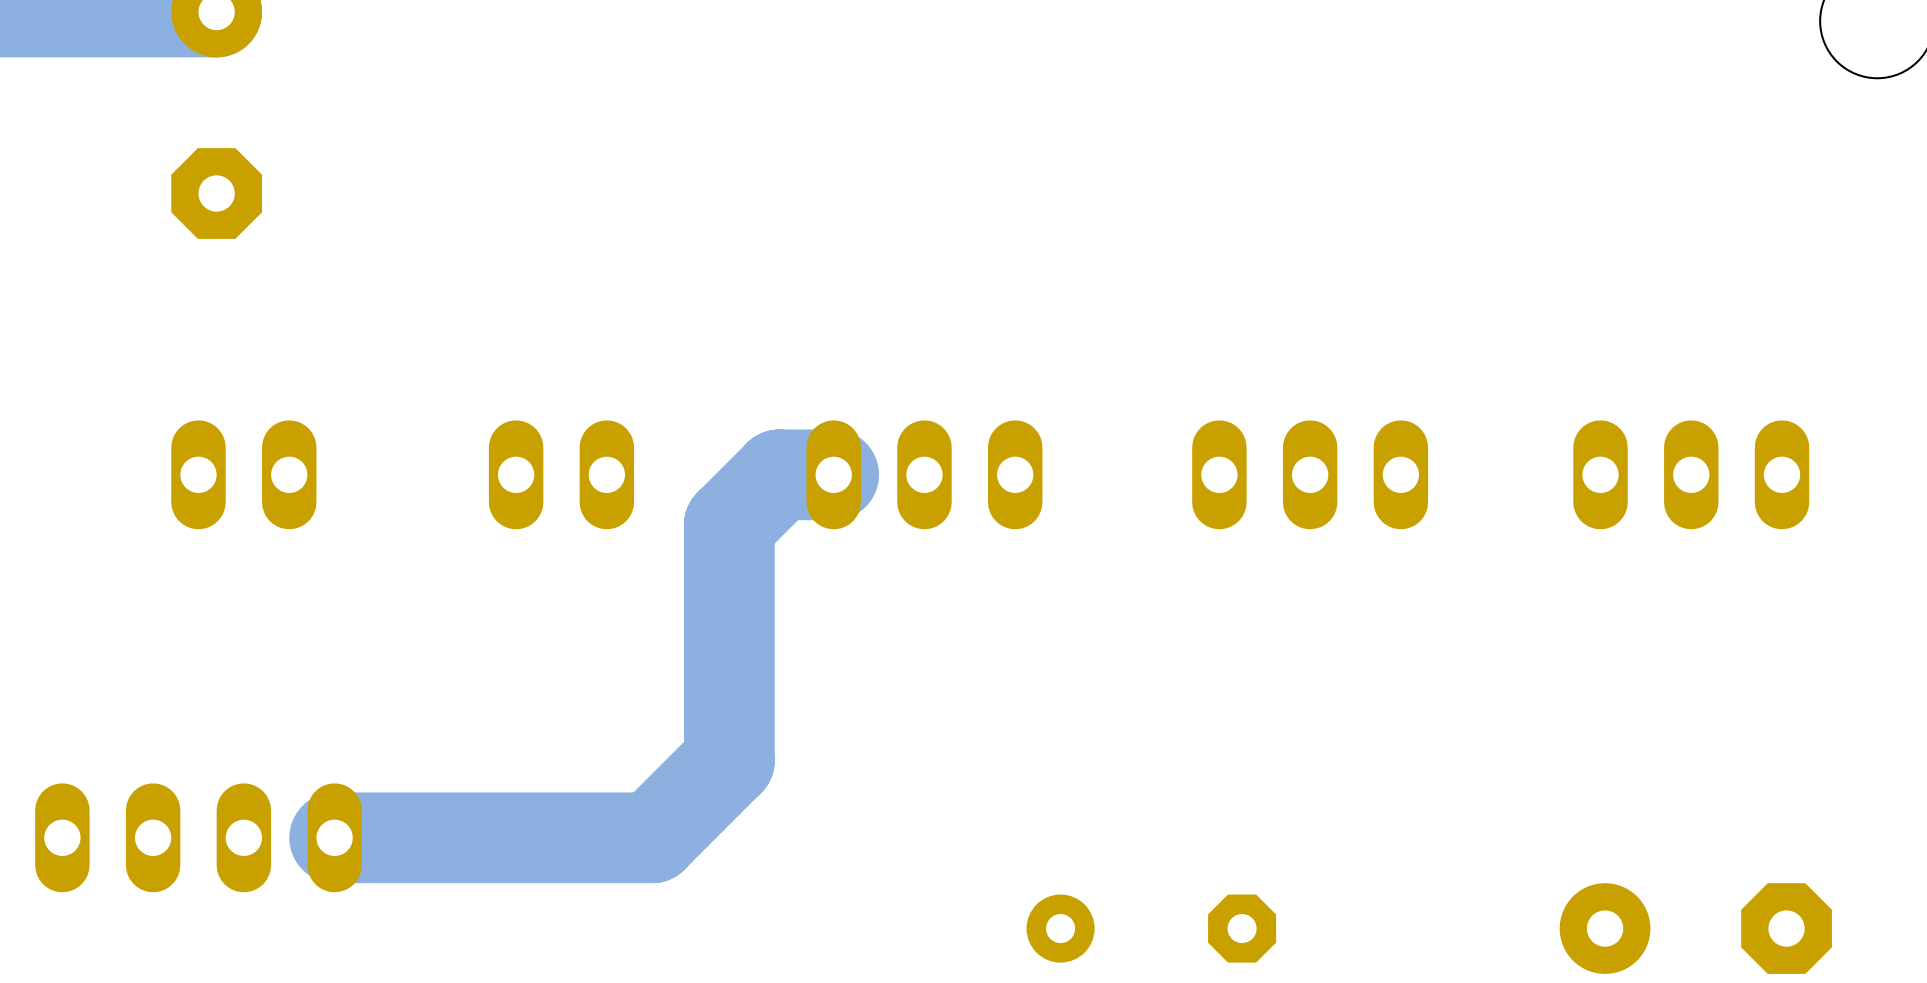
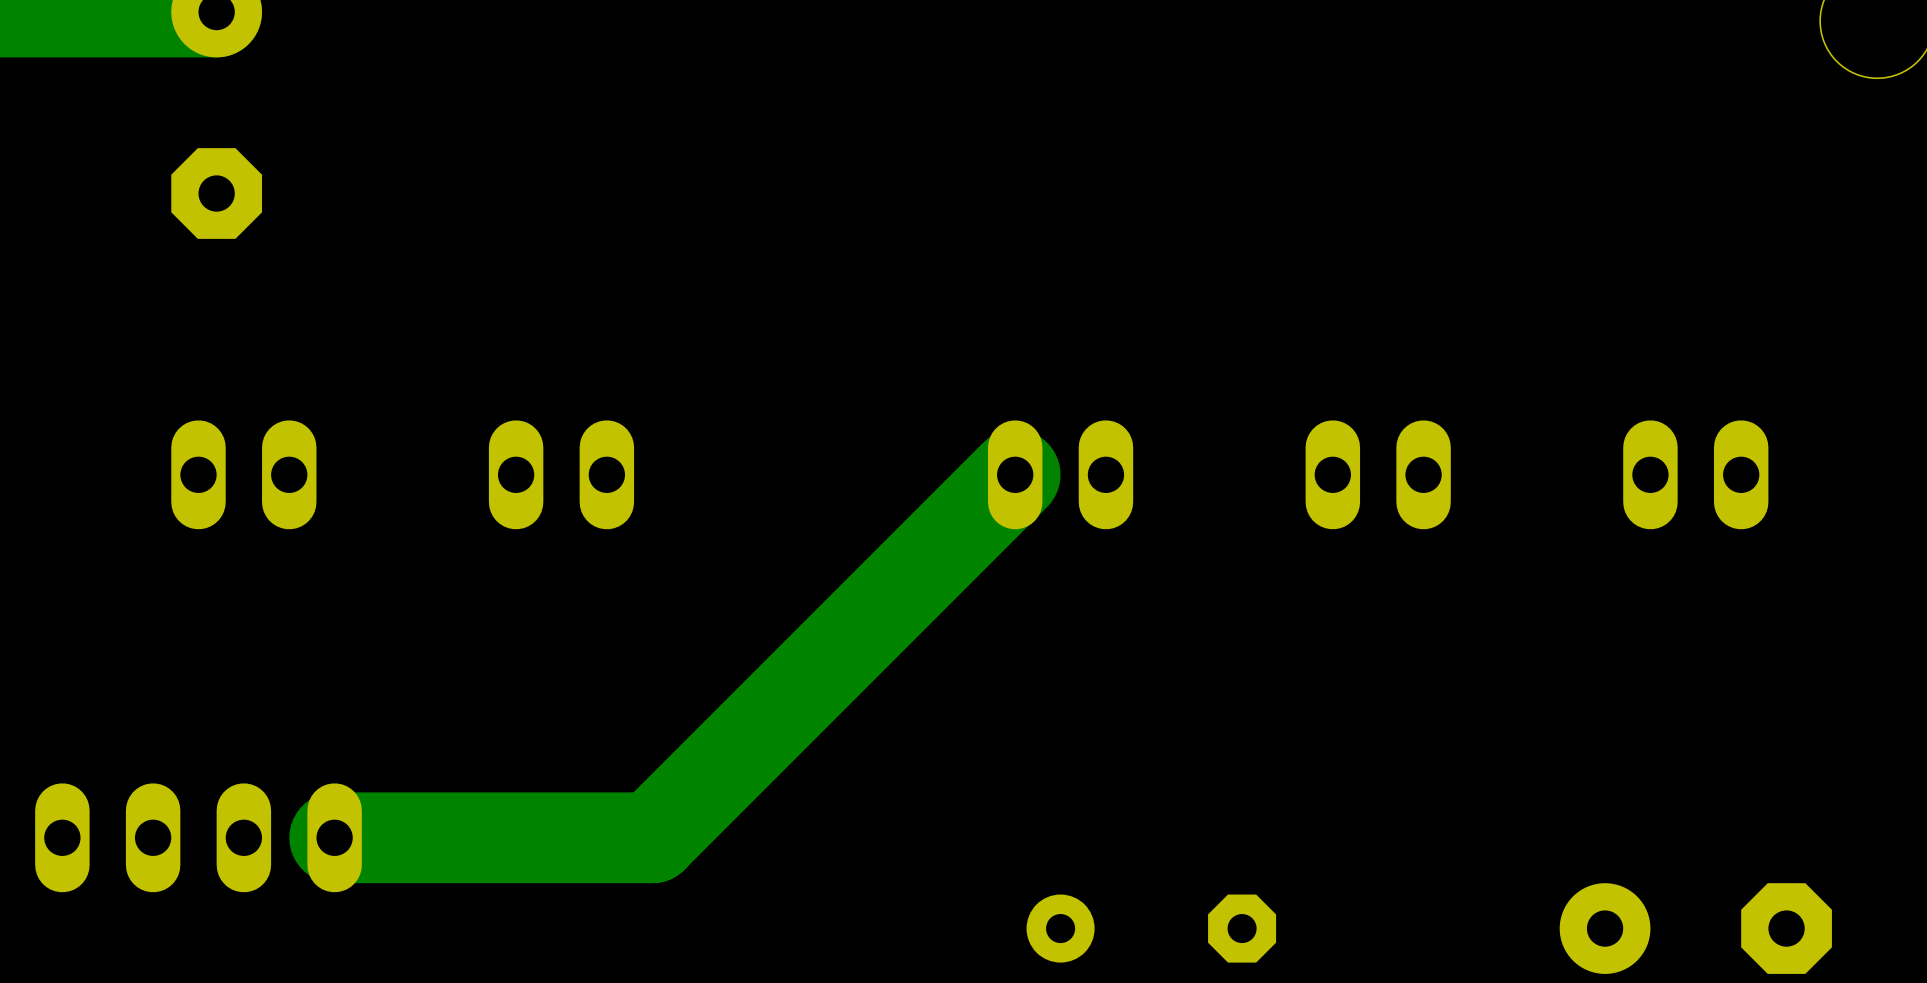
part footprint: [1573, 420, 1810, 530] -> [1623, 420, 1769, 530]
track: (833, 474) (779, 474) (729, 524) (729, 760) -> (1015, 474) (729, 760)
part: (924, 474) -> none
part: none -> (1060, 474)
part: (1310, 474) -> none
part: none -> (1378, 474)

